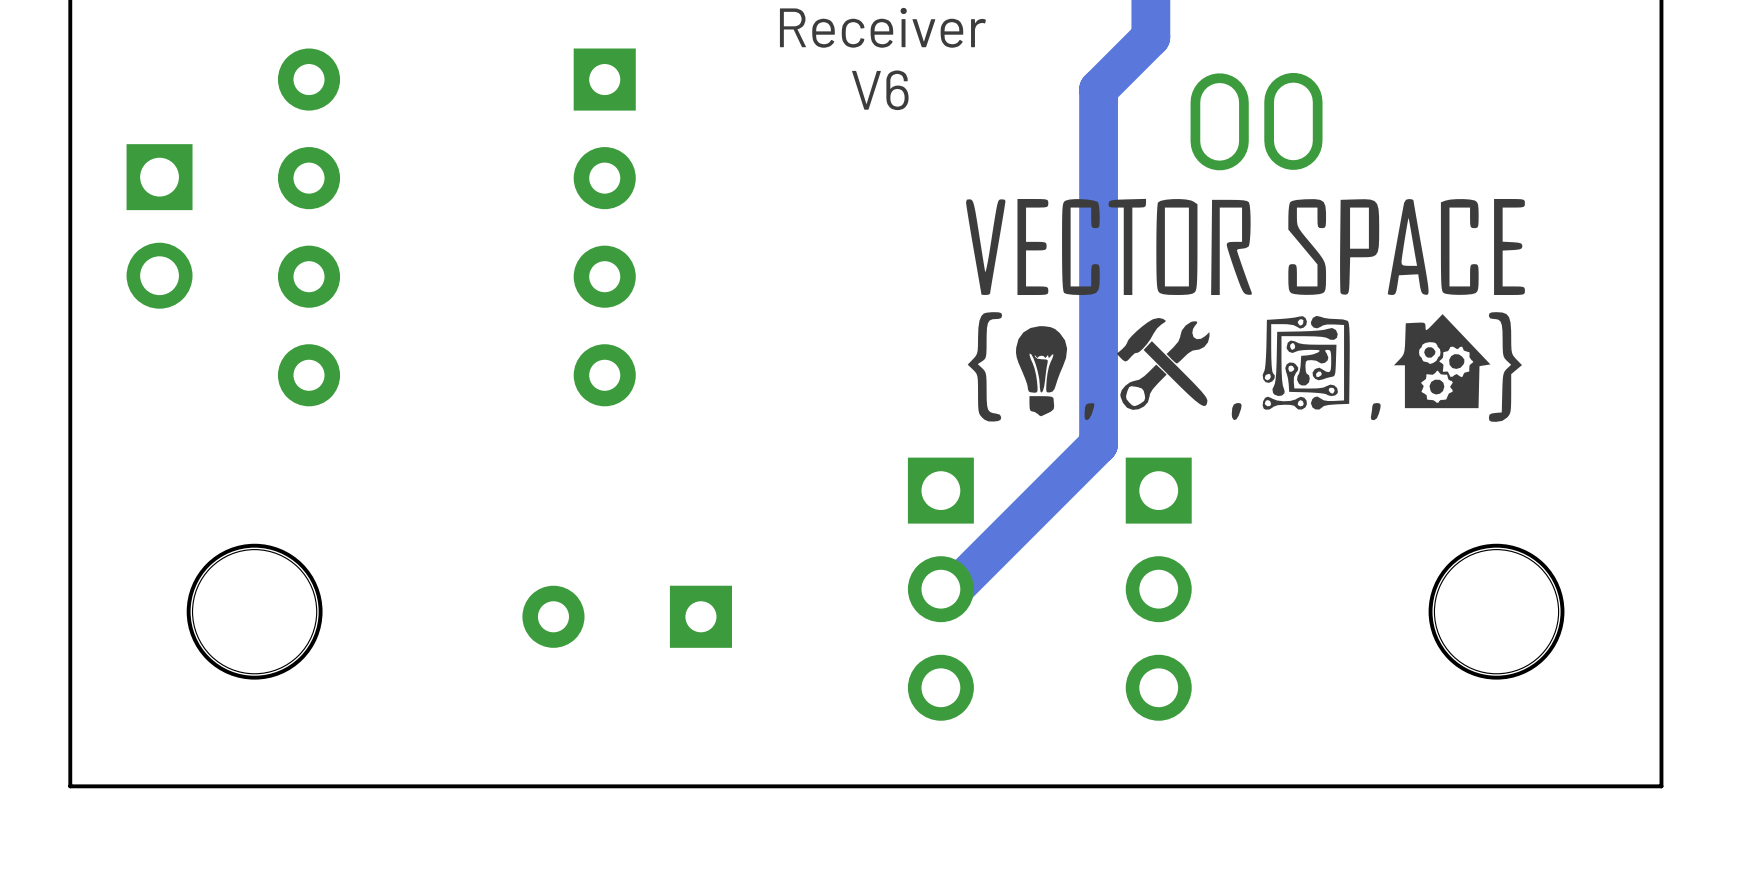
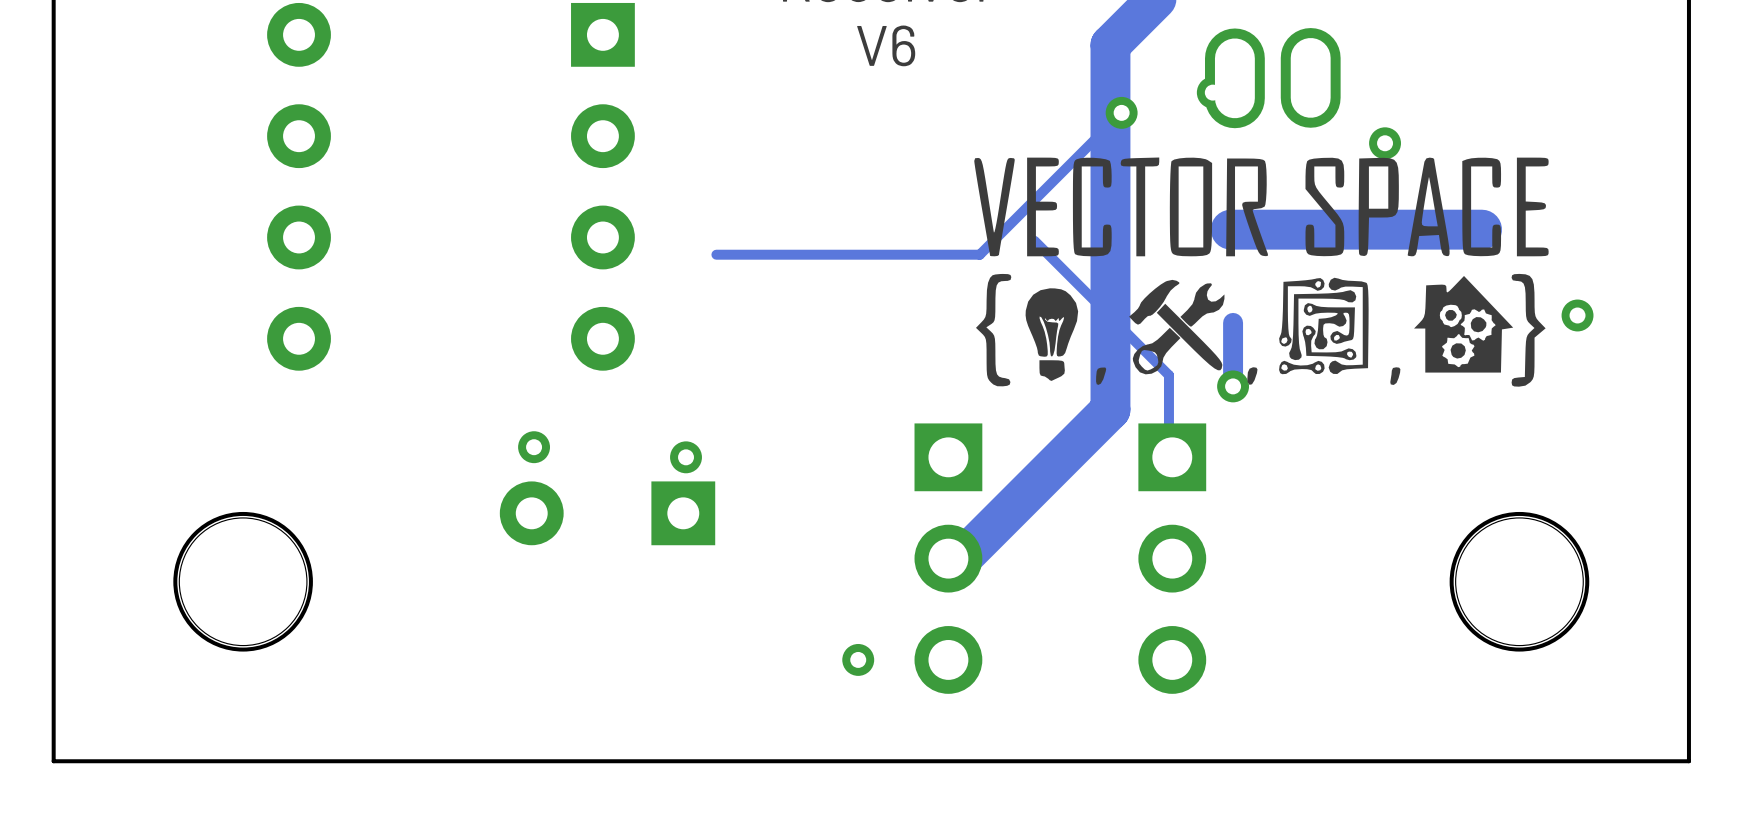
via: none -> (1212, 92)
track: none -> (1121, 112) (979, 254) (716, 254)
via: none -> (1121, 112)
via: none -> (1385, 143)
part: (159, 226) -> none
track: none -> (1482, 229) (1230, 229)
track: none -> (1034, 240) (1168, 375) (1168, 453)
via: none -> (1577, 315)
track: none -> (1230, 320) (1233, 322) (1233, 386)
via: none -> (1233, 386)
via: none -> (534, 447)
via: none -> (686, 457)
part position: (627, 616) -> (607, 513)
via: none -> (858, 659)

